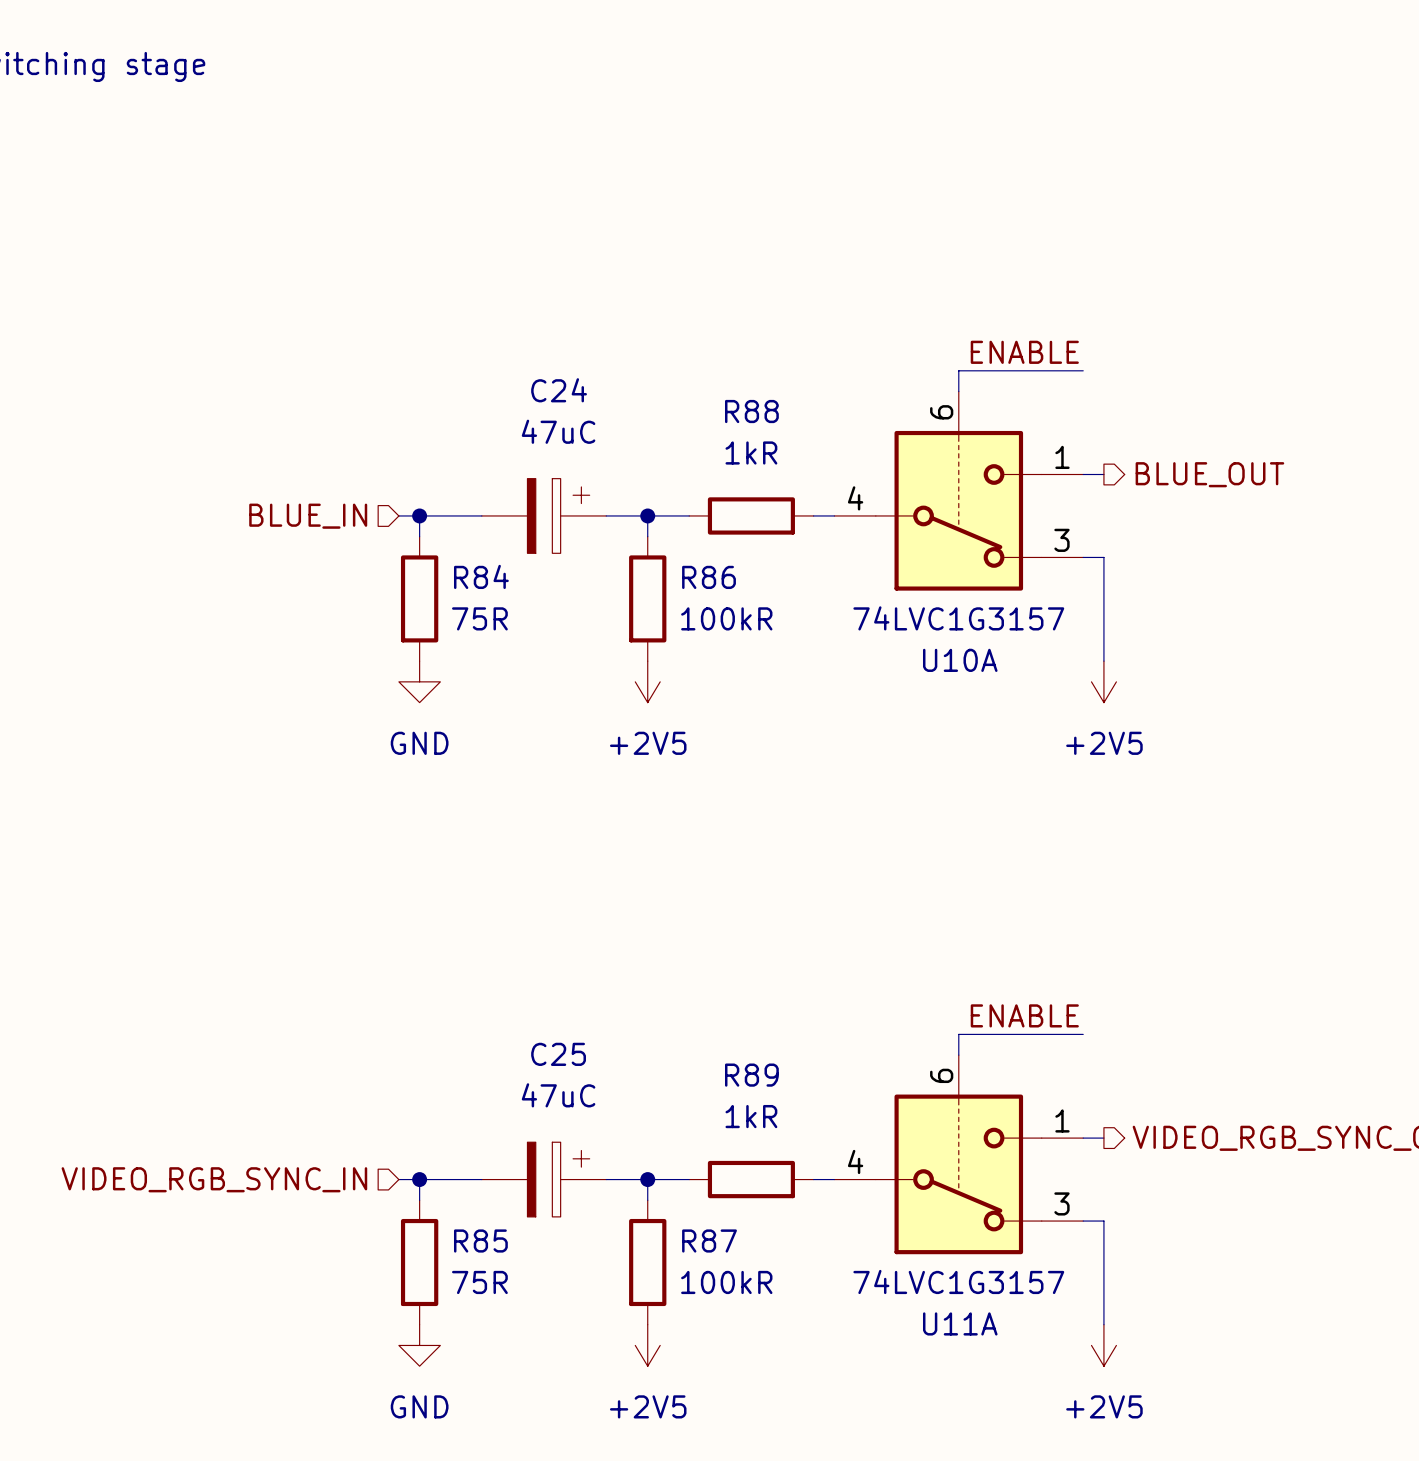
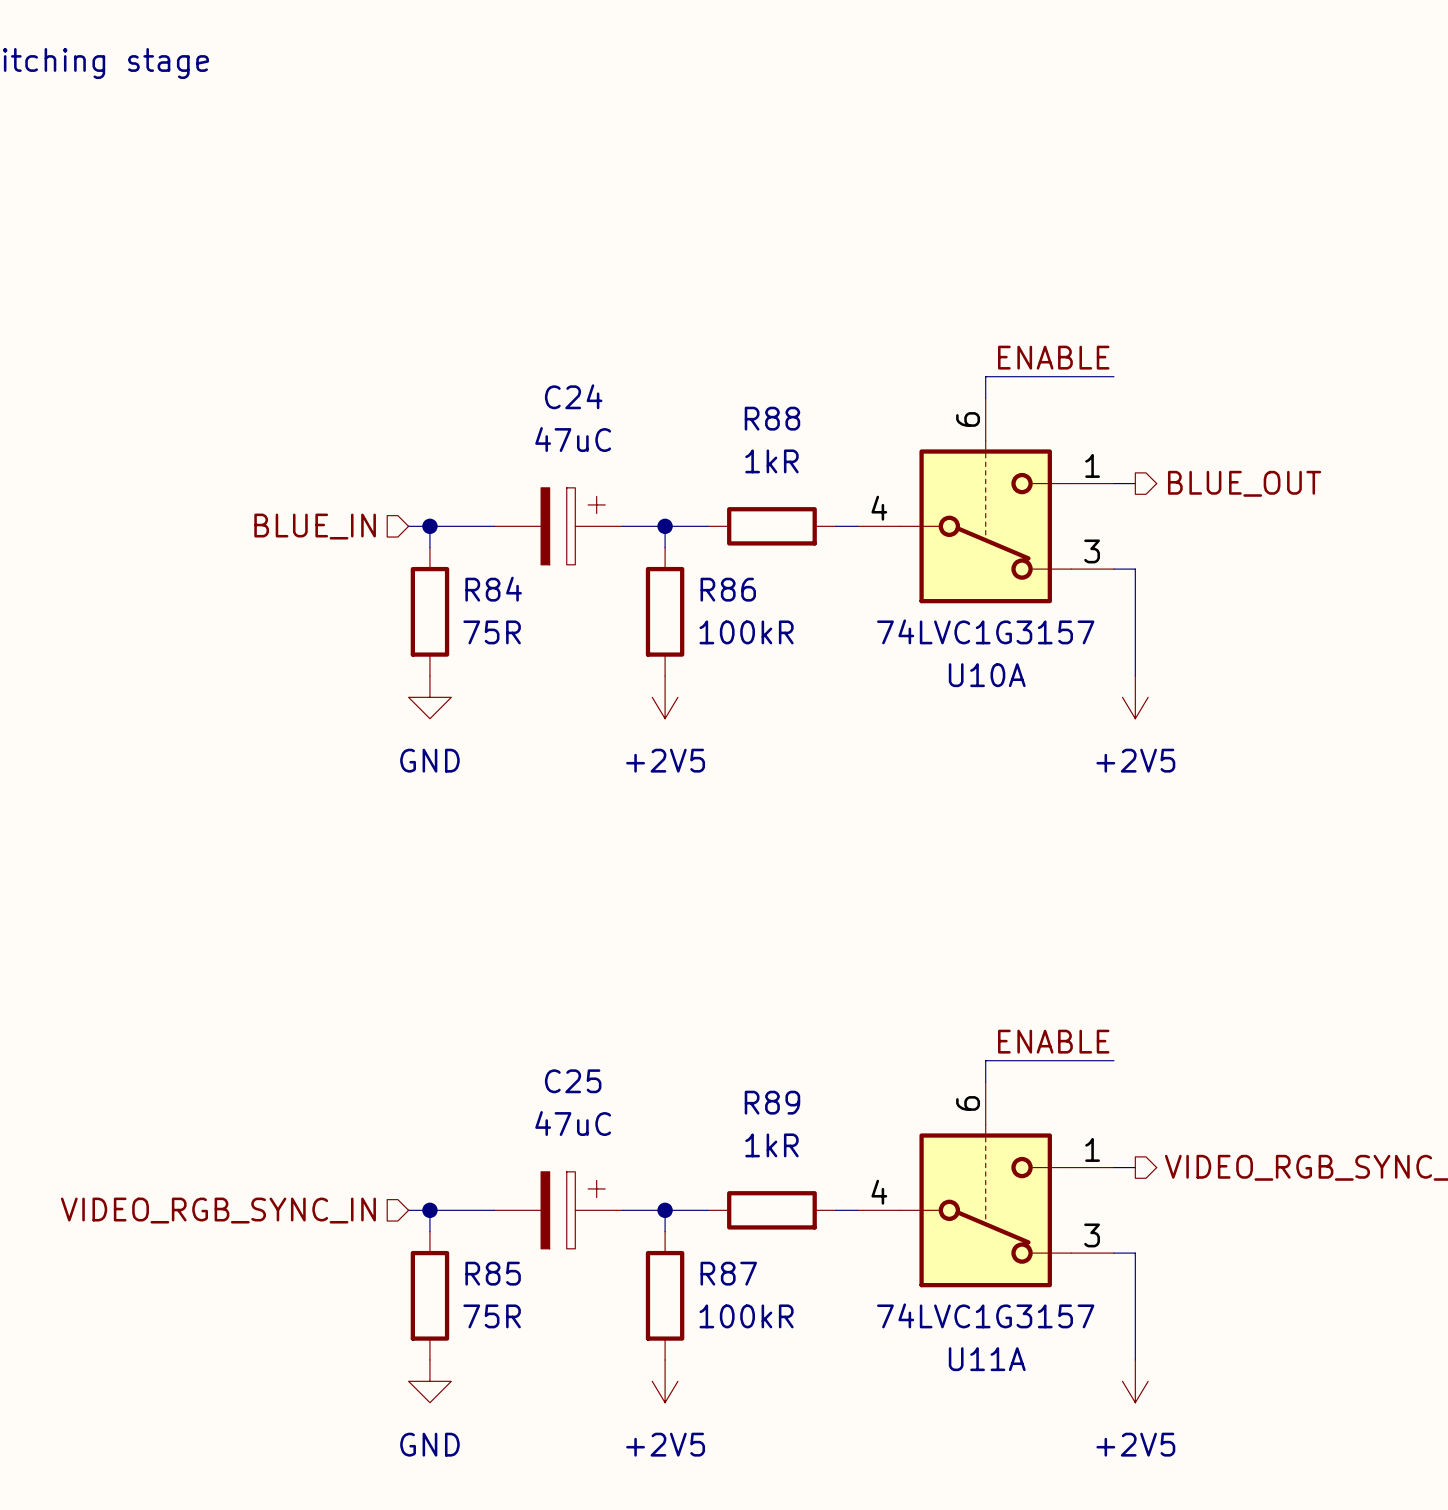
U10A symbol: [834, 391, 1084, 591] -> [857, 398, 1114, 604]
U11A symbol: [834, 1055, 1084, 1255] -> [857, 1082, 1114, 1288]

